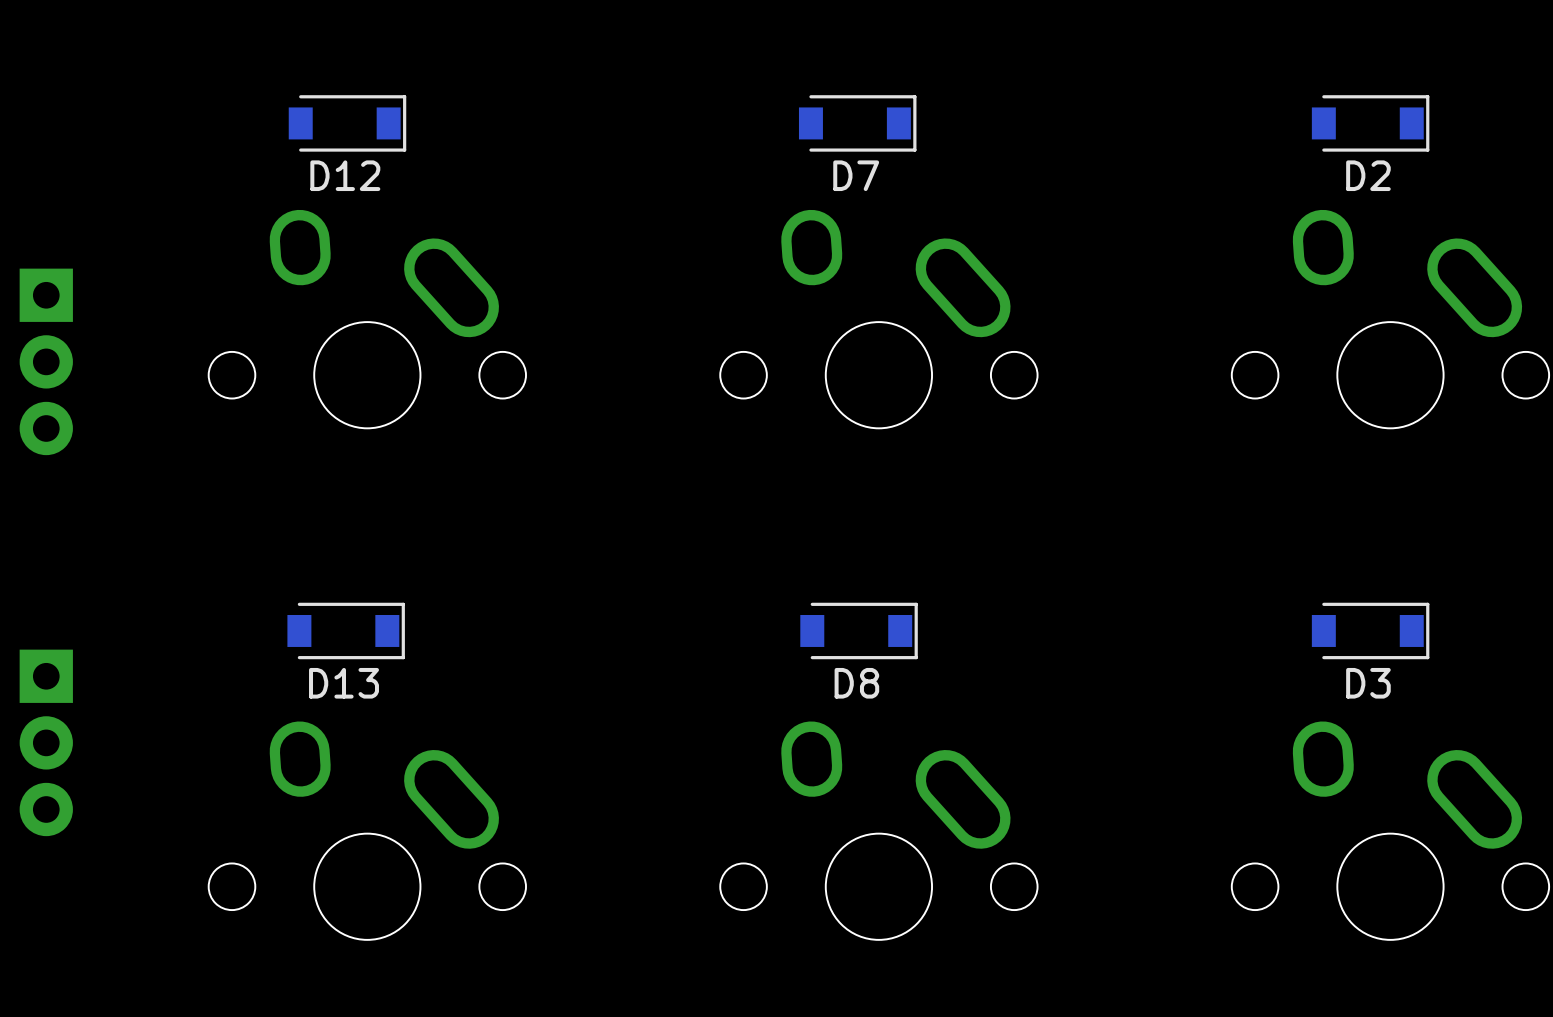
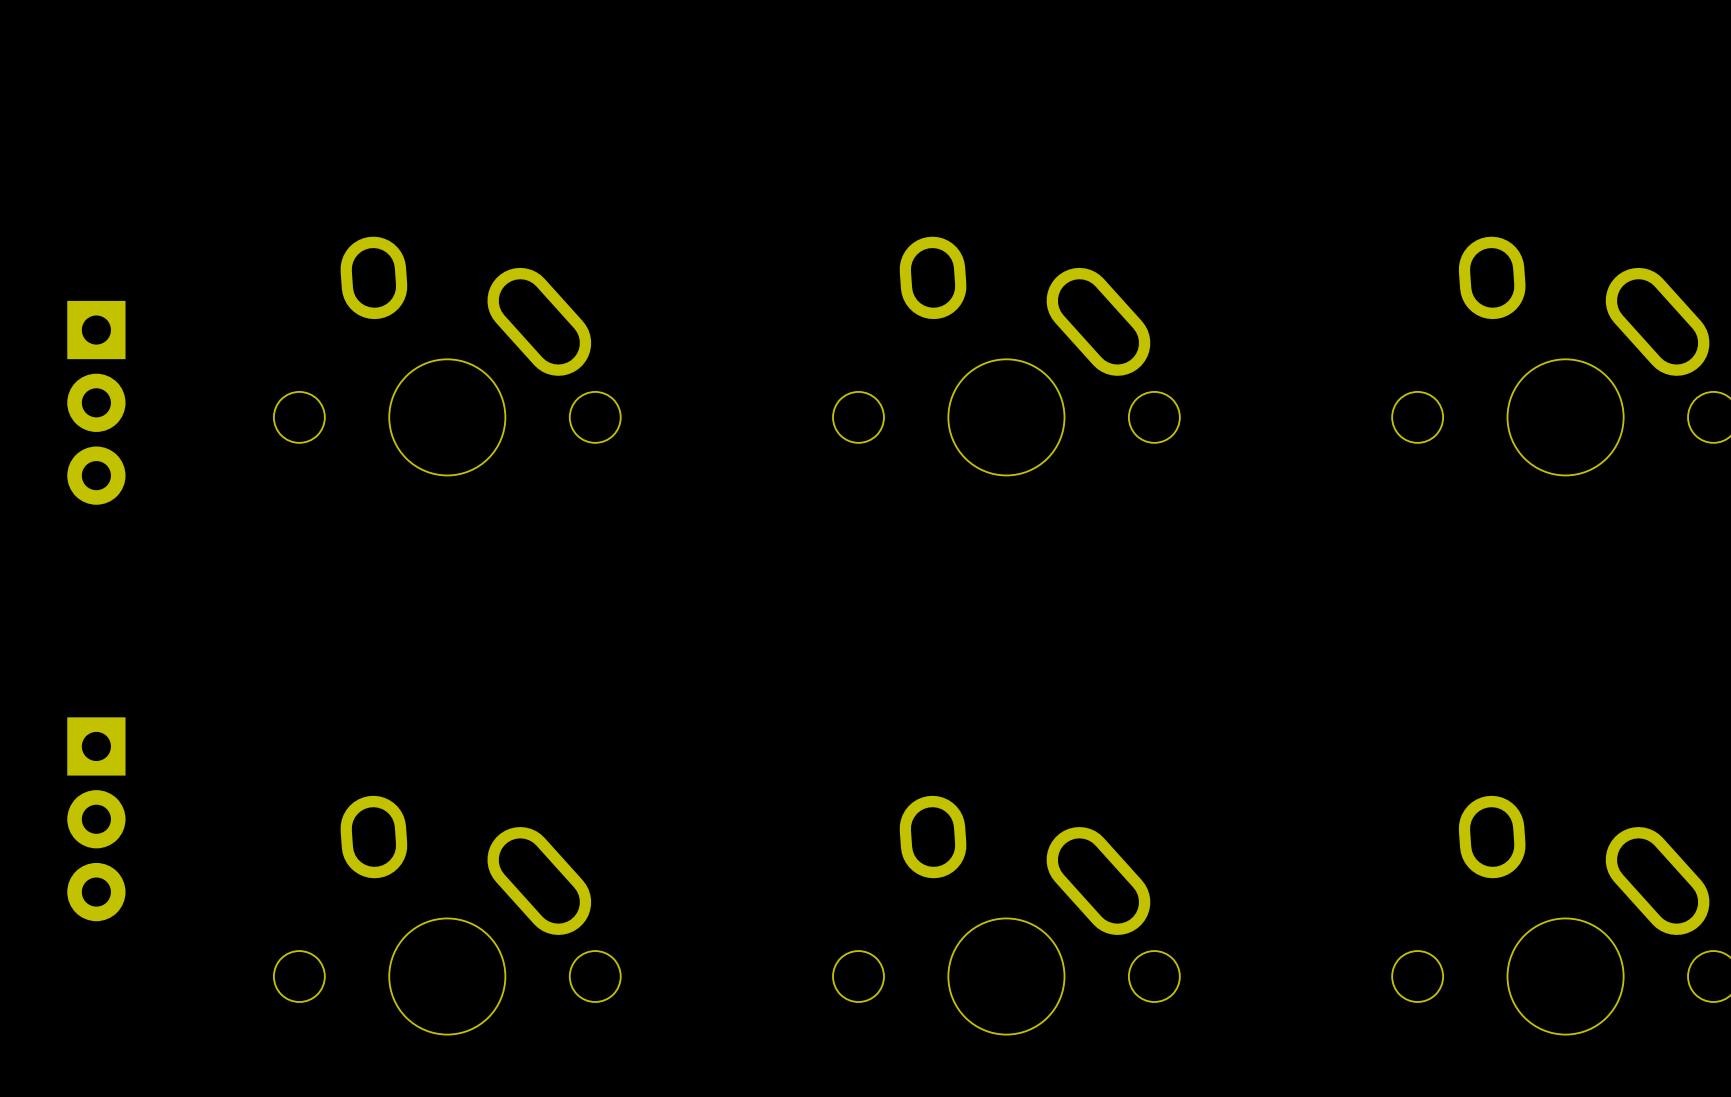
D12: (347, 123) -> none
D7: (857, 123) -> none
D2: (1370, 123) -> none
D13: (346, 630) -> none
D8: (859, 630) -> none
D3: (1370, 630) -> none

